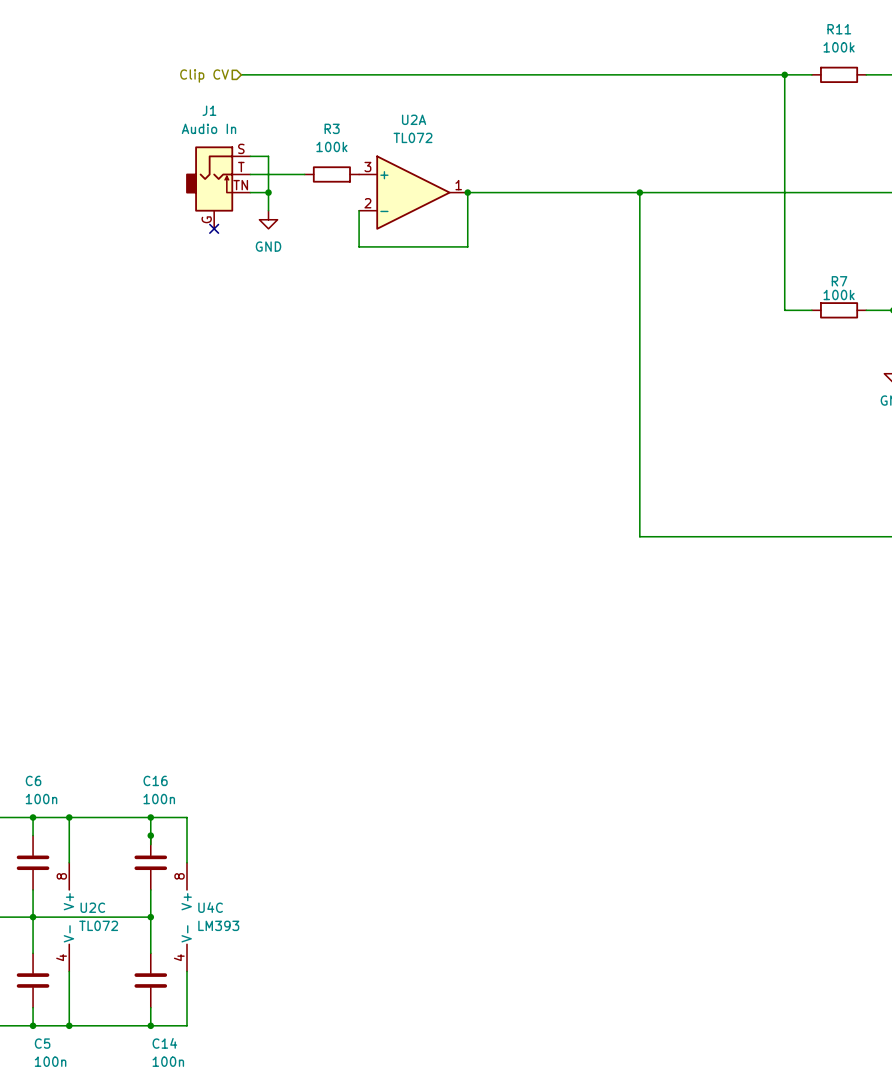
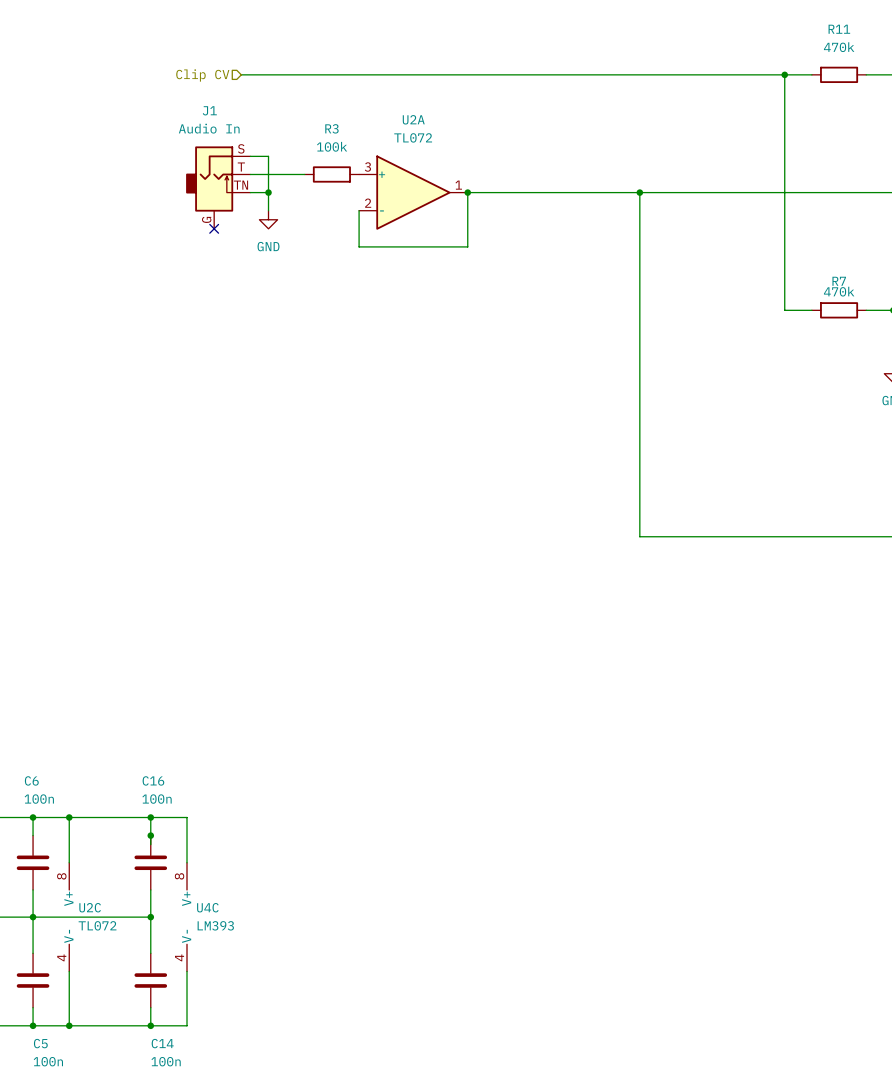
R11 value: 100k (839, 47) -> 470k (839, 47)
R7 value: 100k (839, 294) -> 470k (839, 291)

